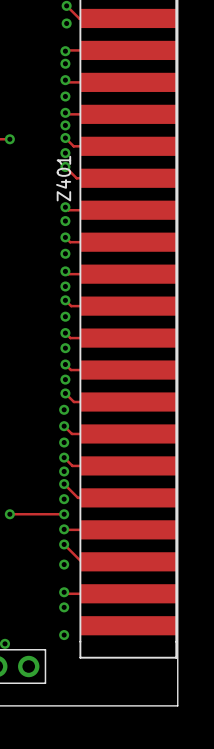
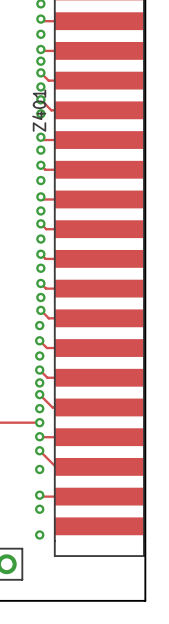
via: none -> (40, 113)

